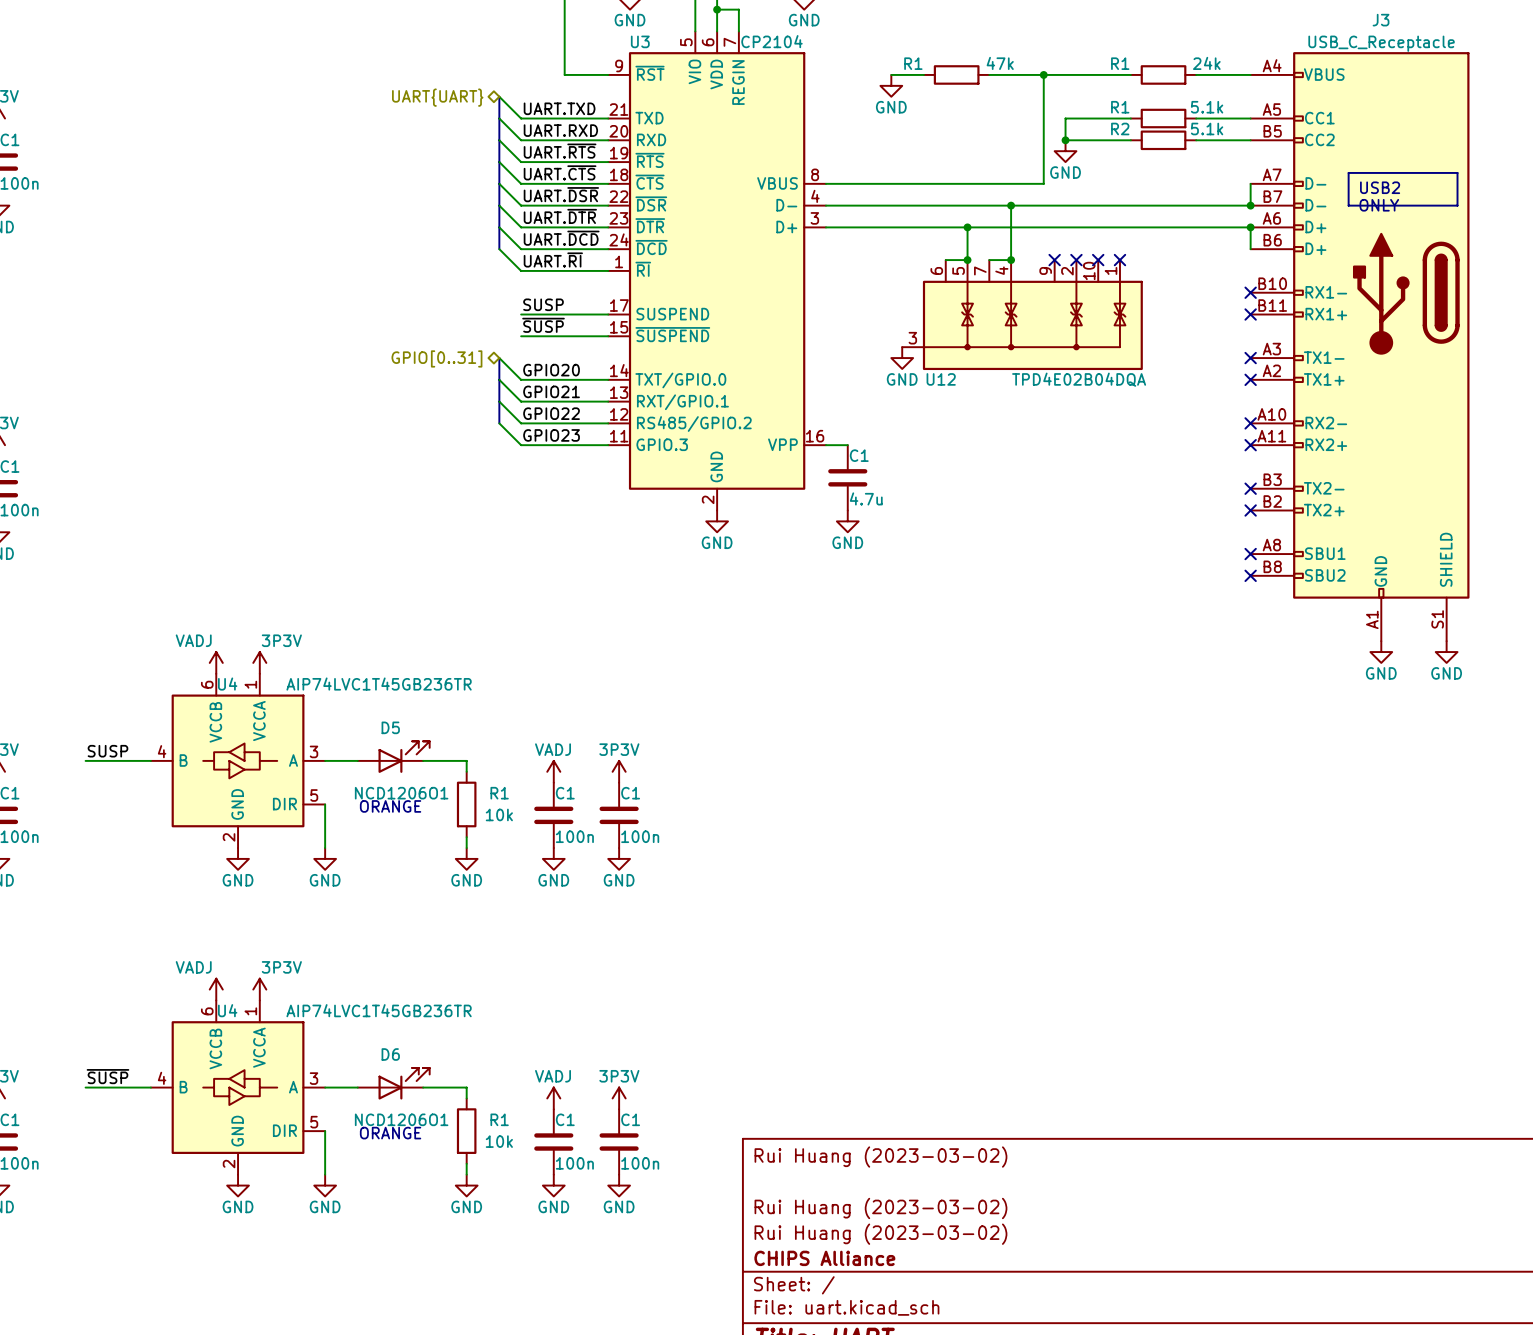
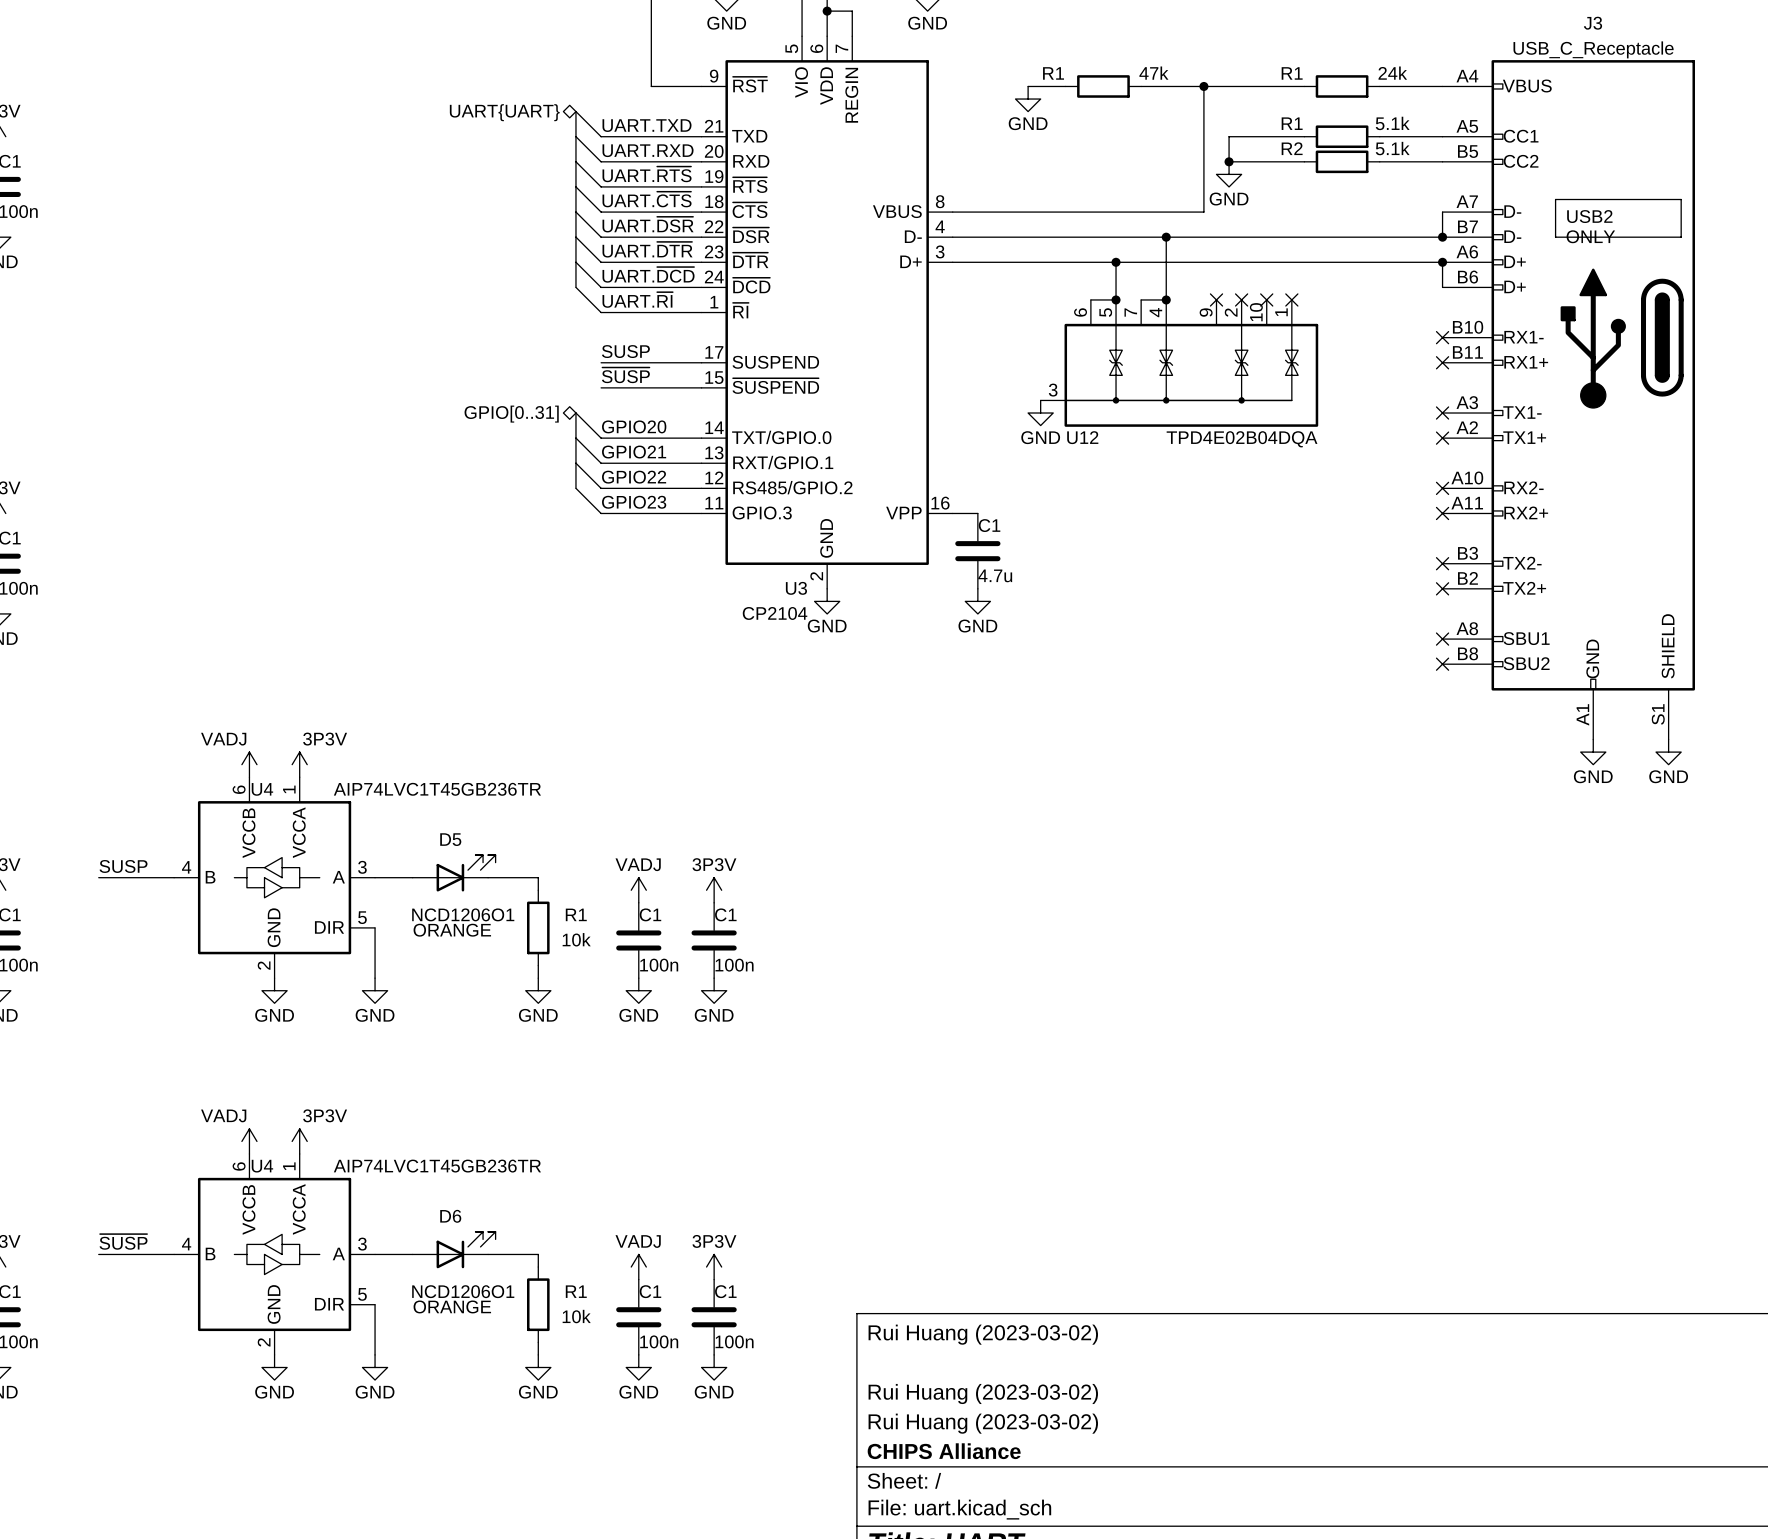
U3 name position: U3 (640, 41) -> U3 (796, 588)
U3 value position: CP2104 (771, 41) -> CP2104 (775, 613)

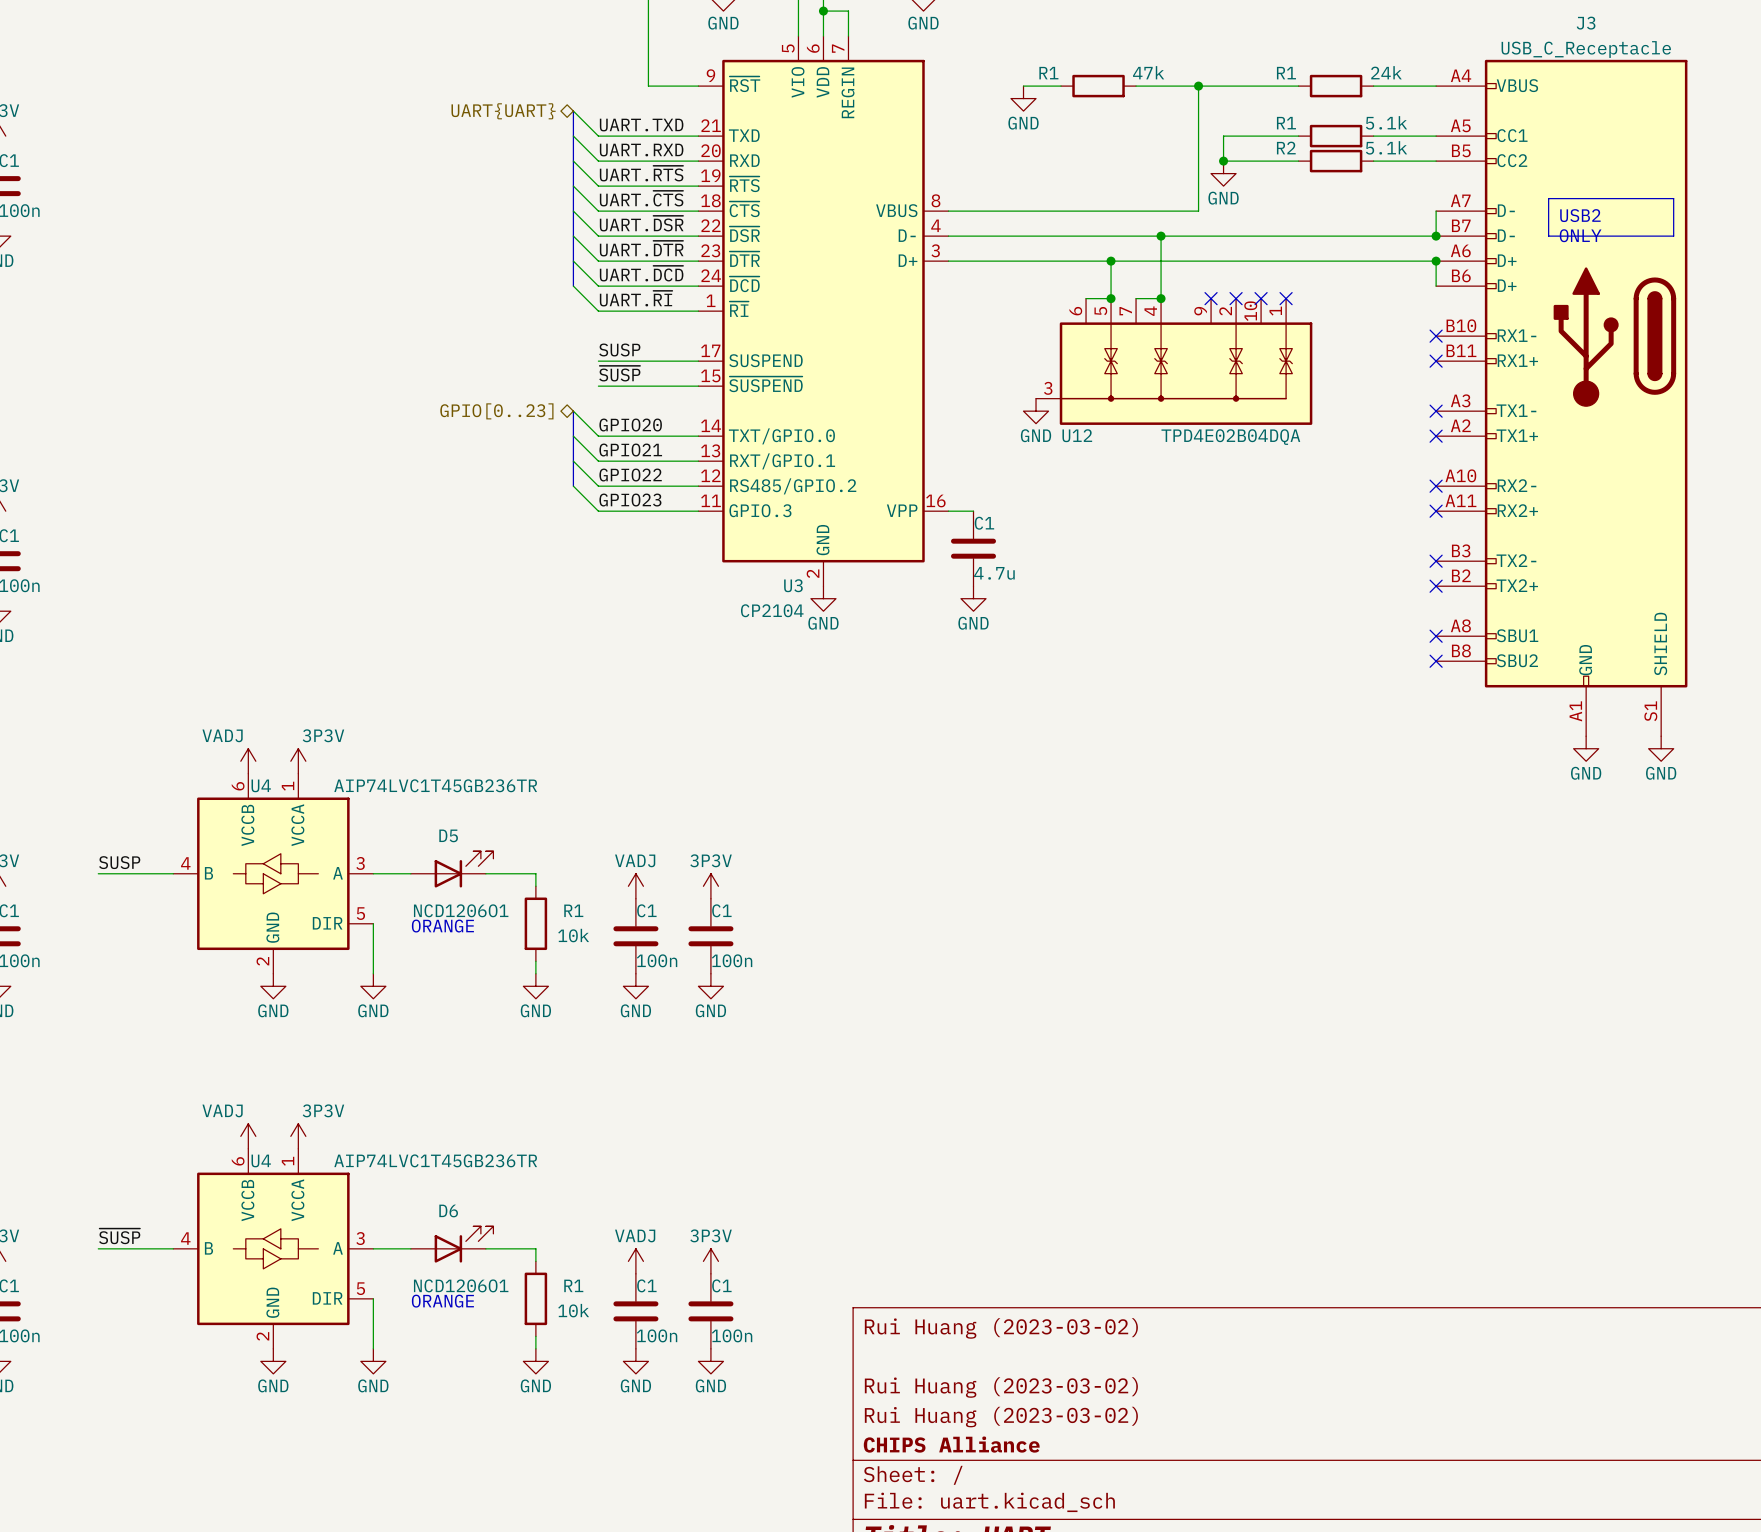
hierarchical label: GPIO[0..31] (511, 414) -> GPIO[0..23] (496, 411)

